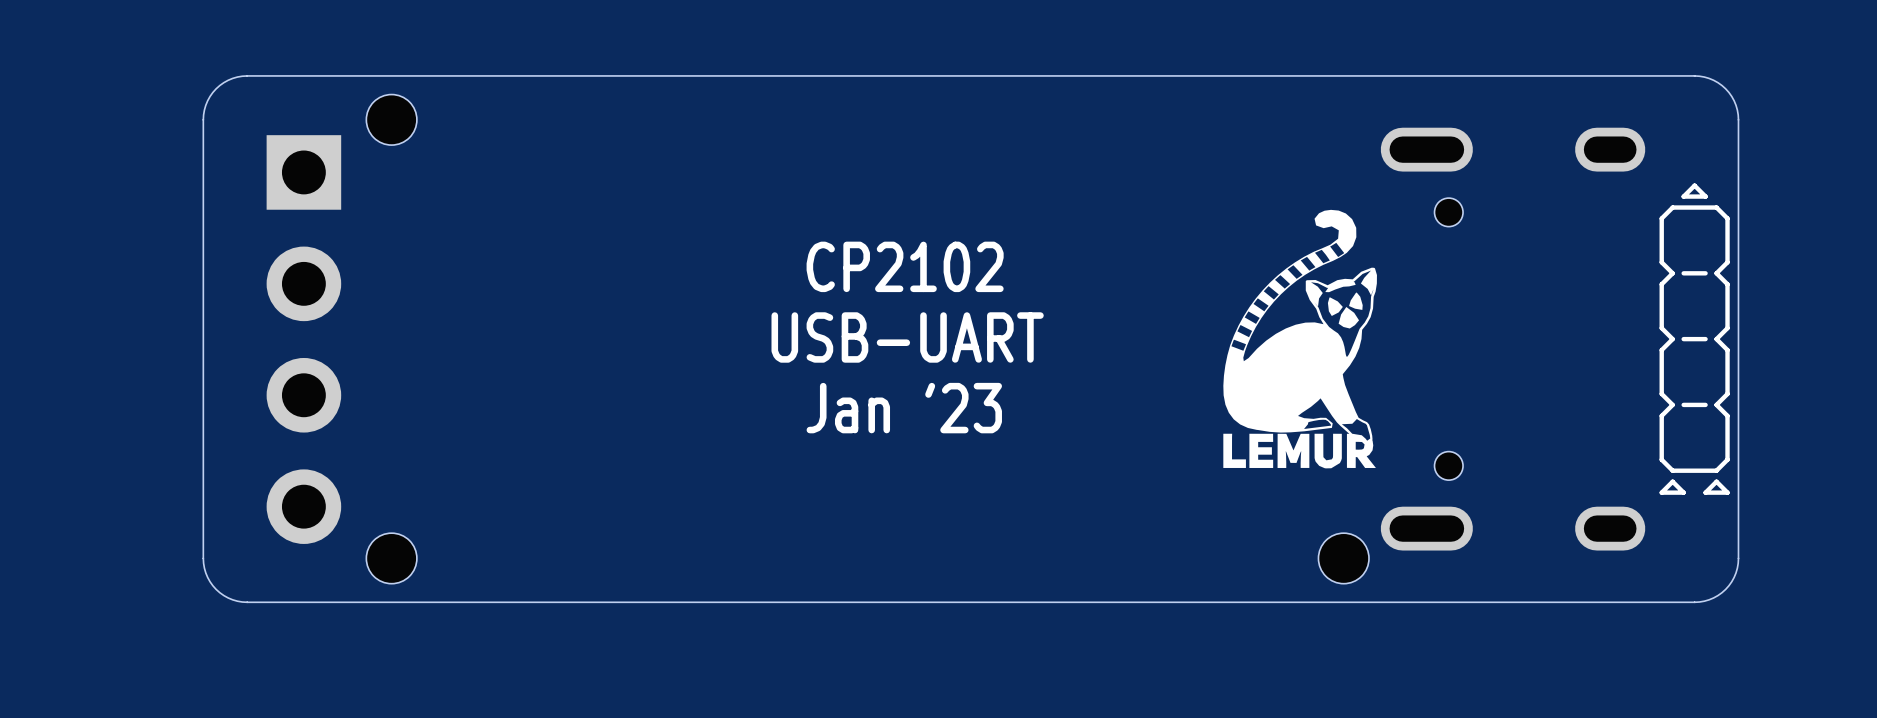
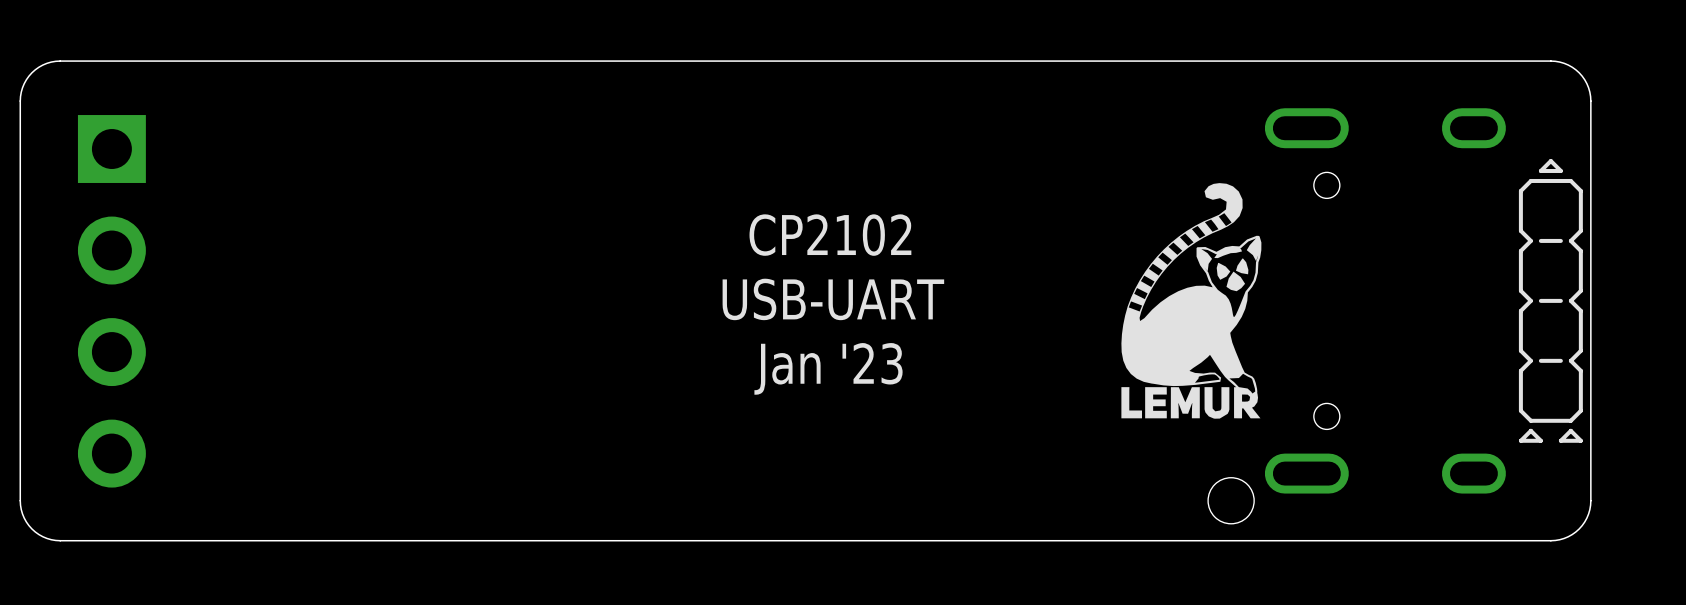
board edge: (247, 75) (228, 80) (216, 88) (207, 100) (203, 119) (203, 563) (207, 577) (216, 589) (228, 597) (247, 602) -> (231, 61) (51, 62) (38, 67) (28, 76) (22, 87) (20, 101) (20, 500) (24, 518) (35, 532) (55, 540) (231, 540)
part: (391, 119) -> none
part position: (303, 339) -> (111, 301)
part: (391, 558) -> none

